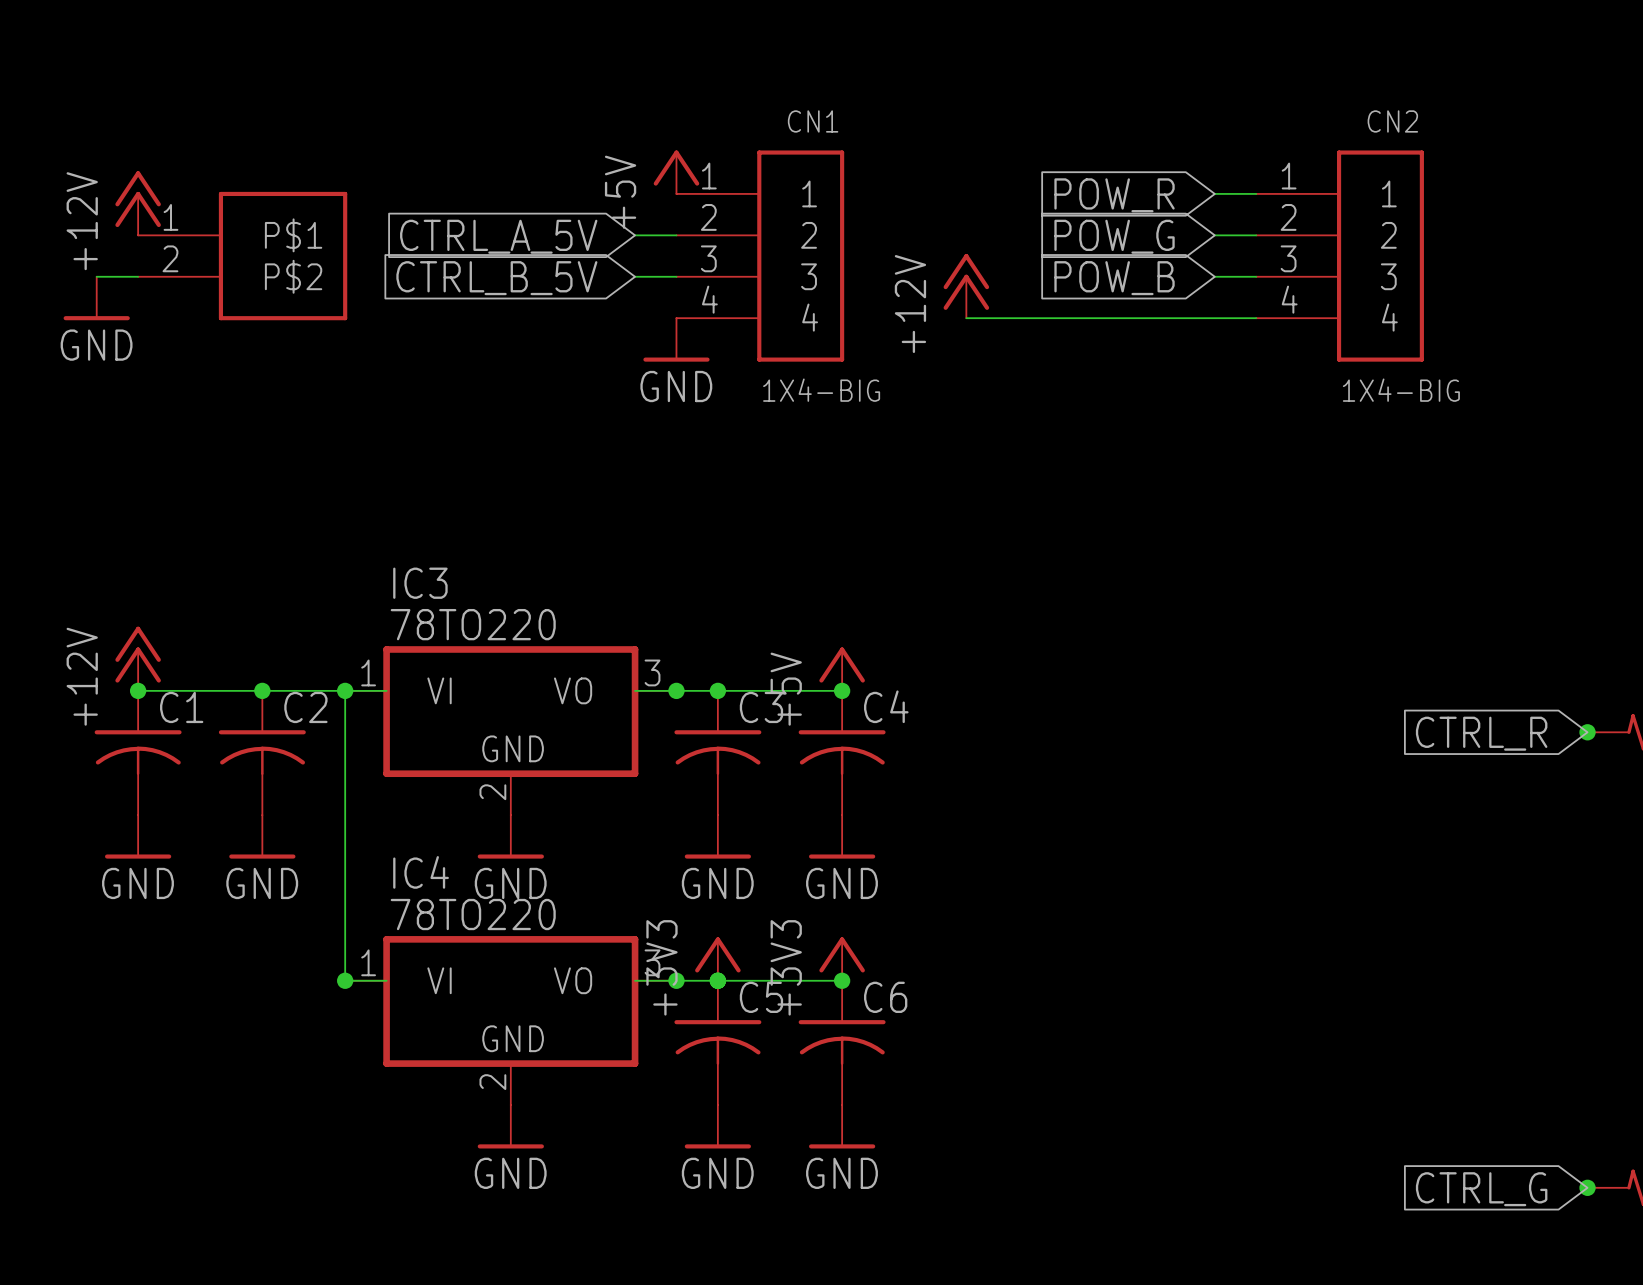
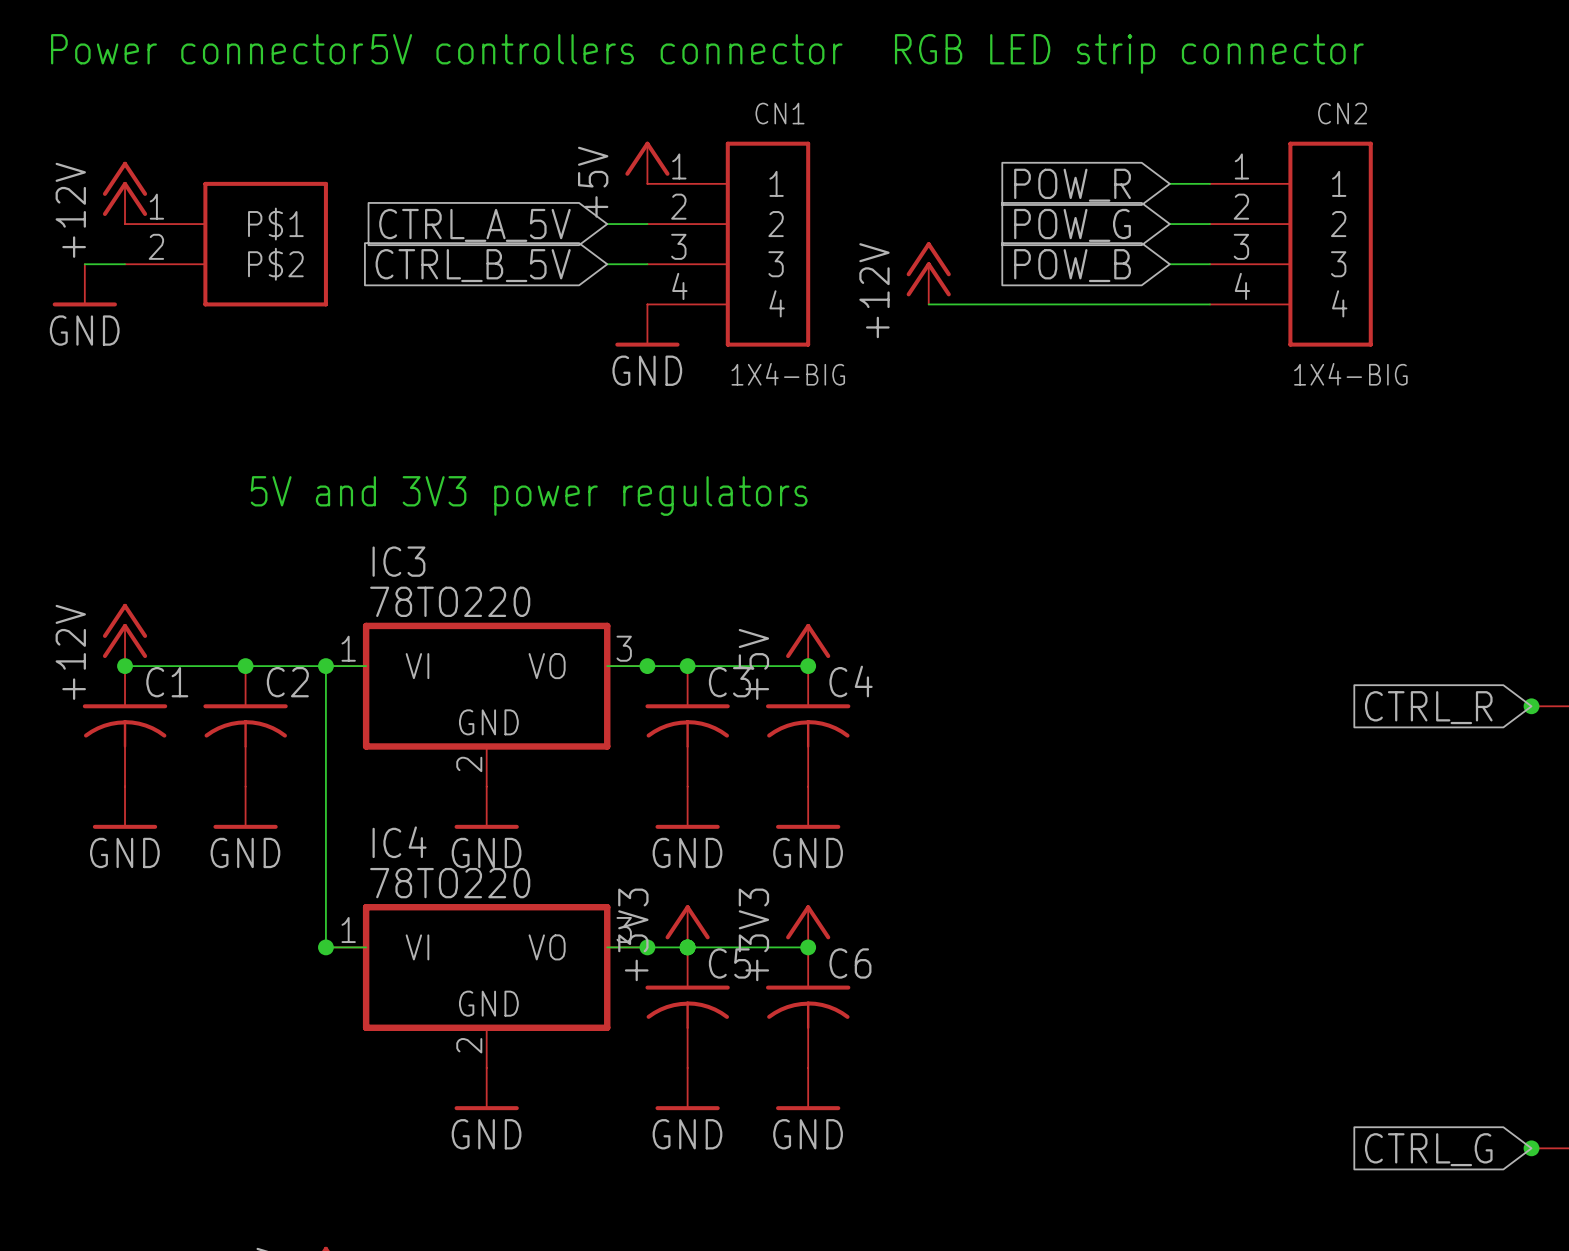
text: none -> Power connector (207, 49)
text: none -> 5V controllers connector (606, 49)
text: none -> RGB LED strip connector (1129, 53)
text: none -> 5V and 3V3 power regulators (529, 495)

